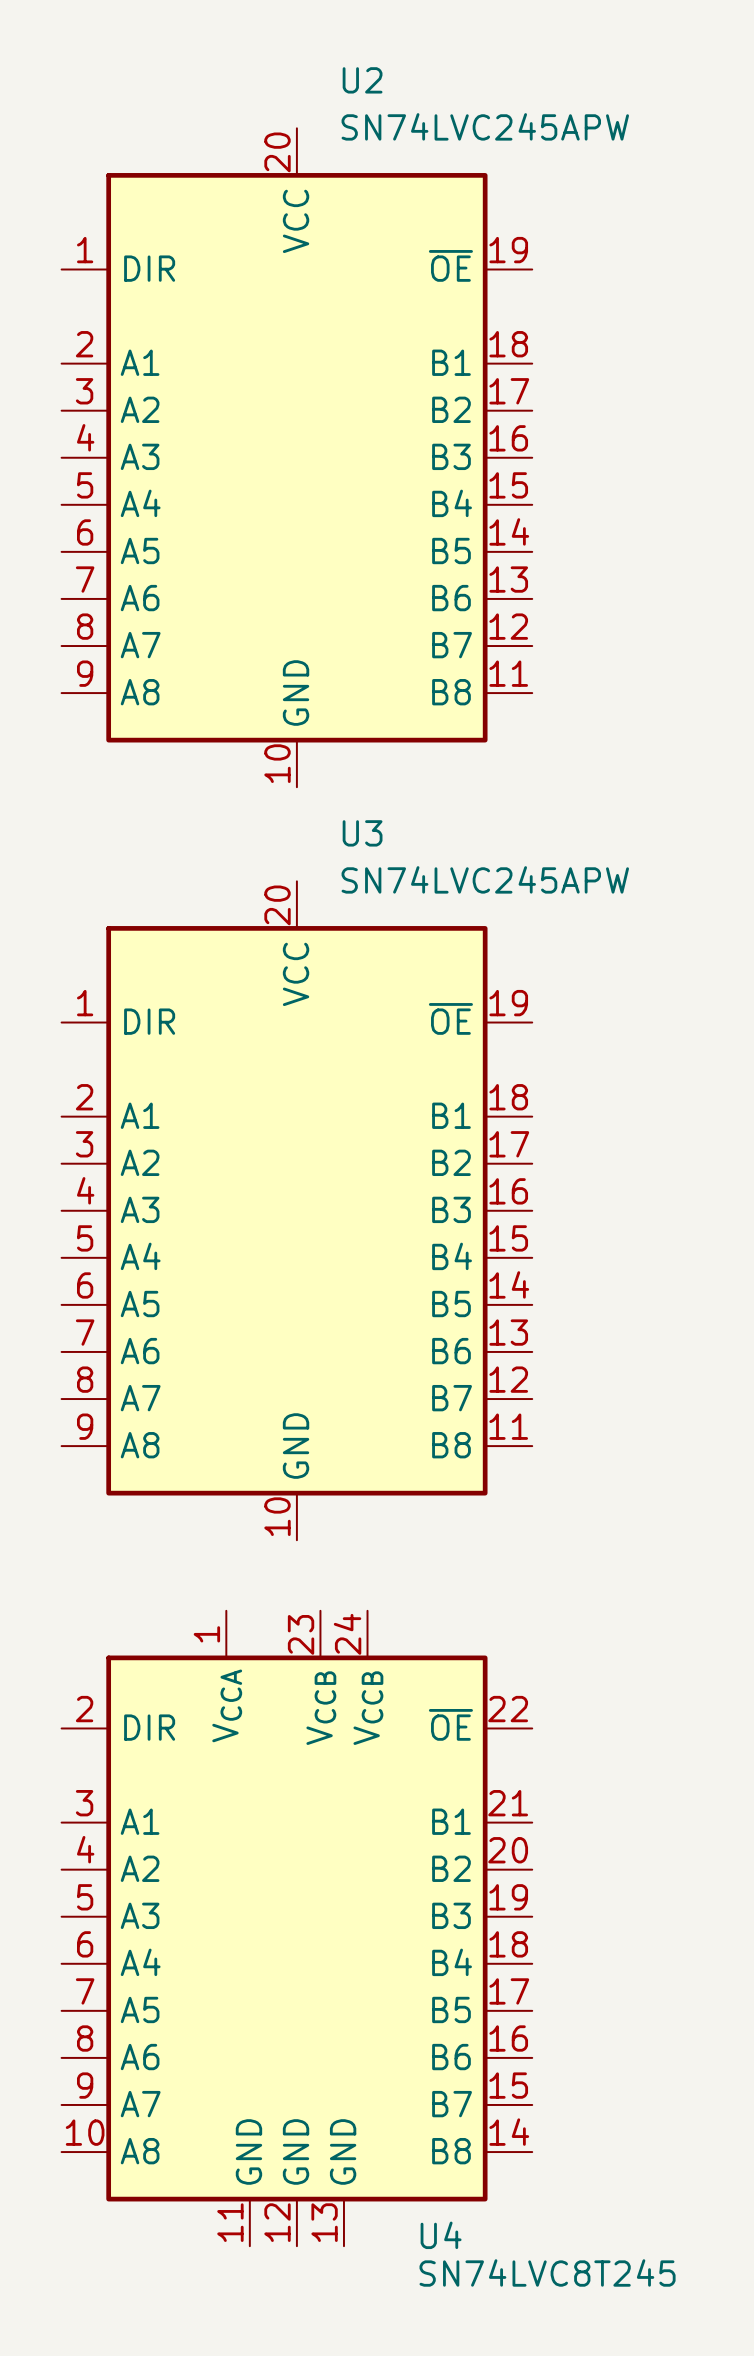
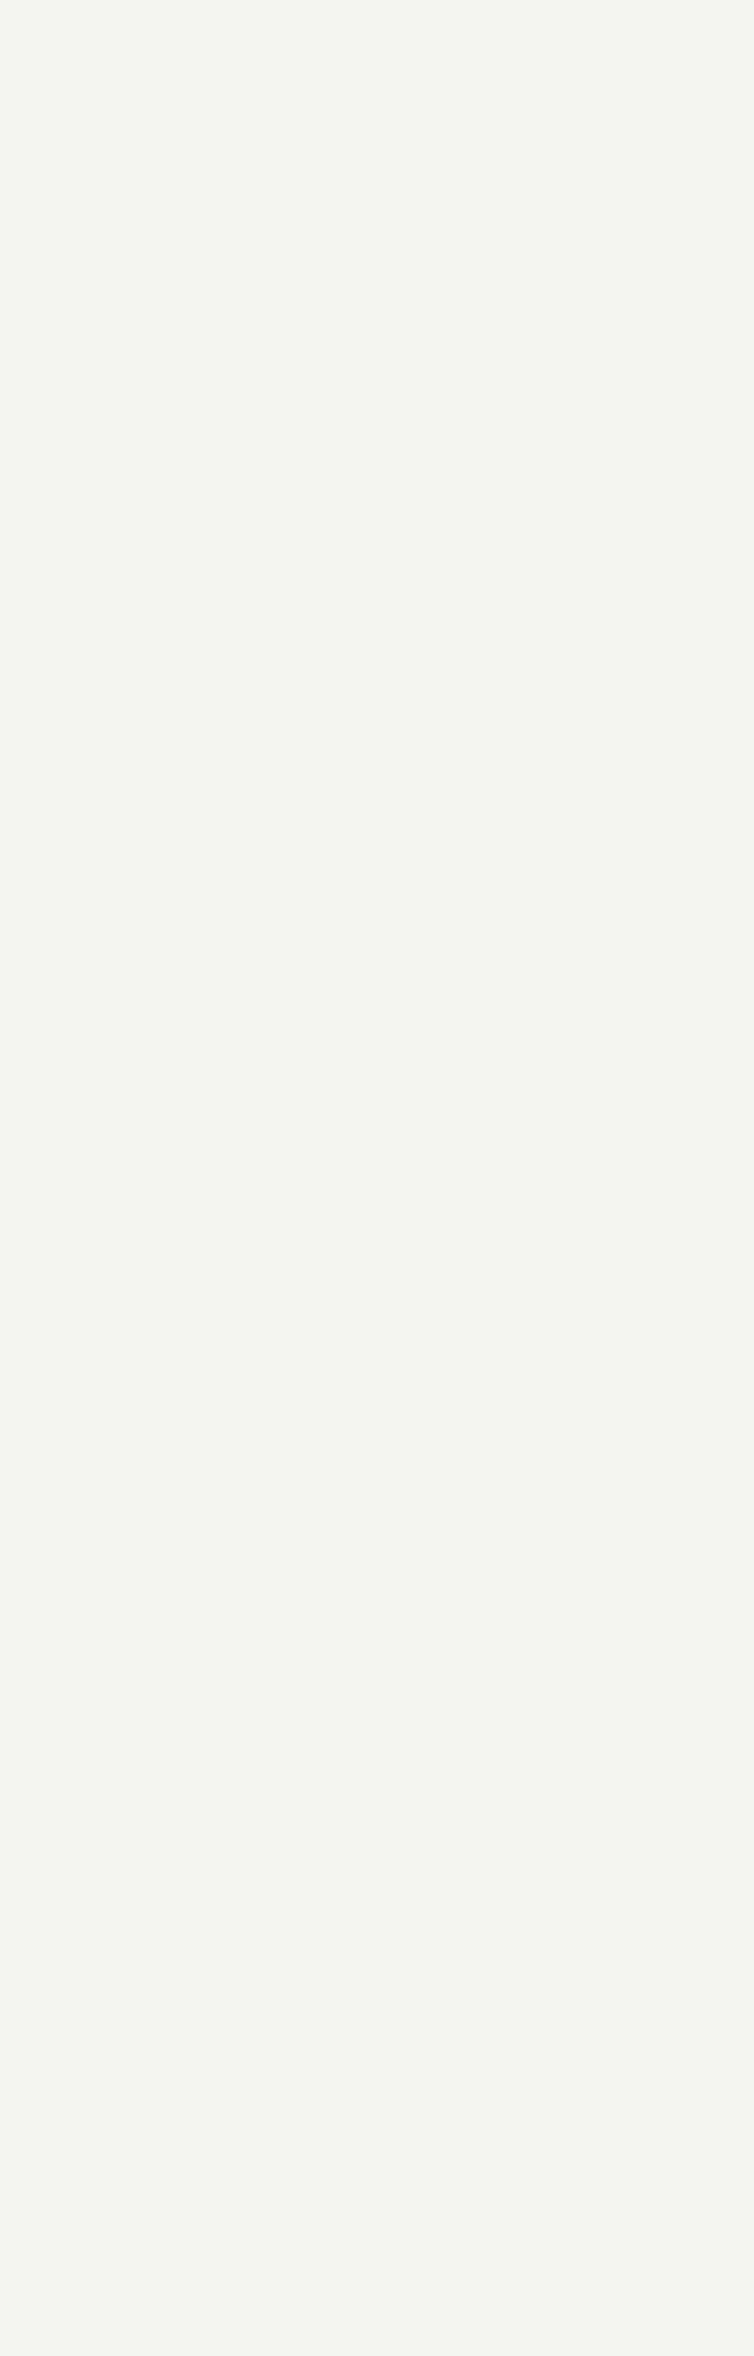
U2: SN74LVC245APW (296, 457) -> none
U3: SN74LVC245APW (296, 1210) -> none
U4: SN74LVC8T245 (296, 1928) -> none

